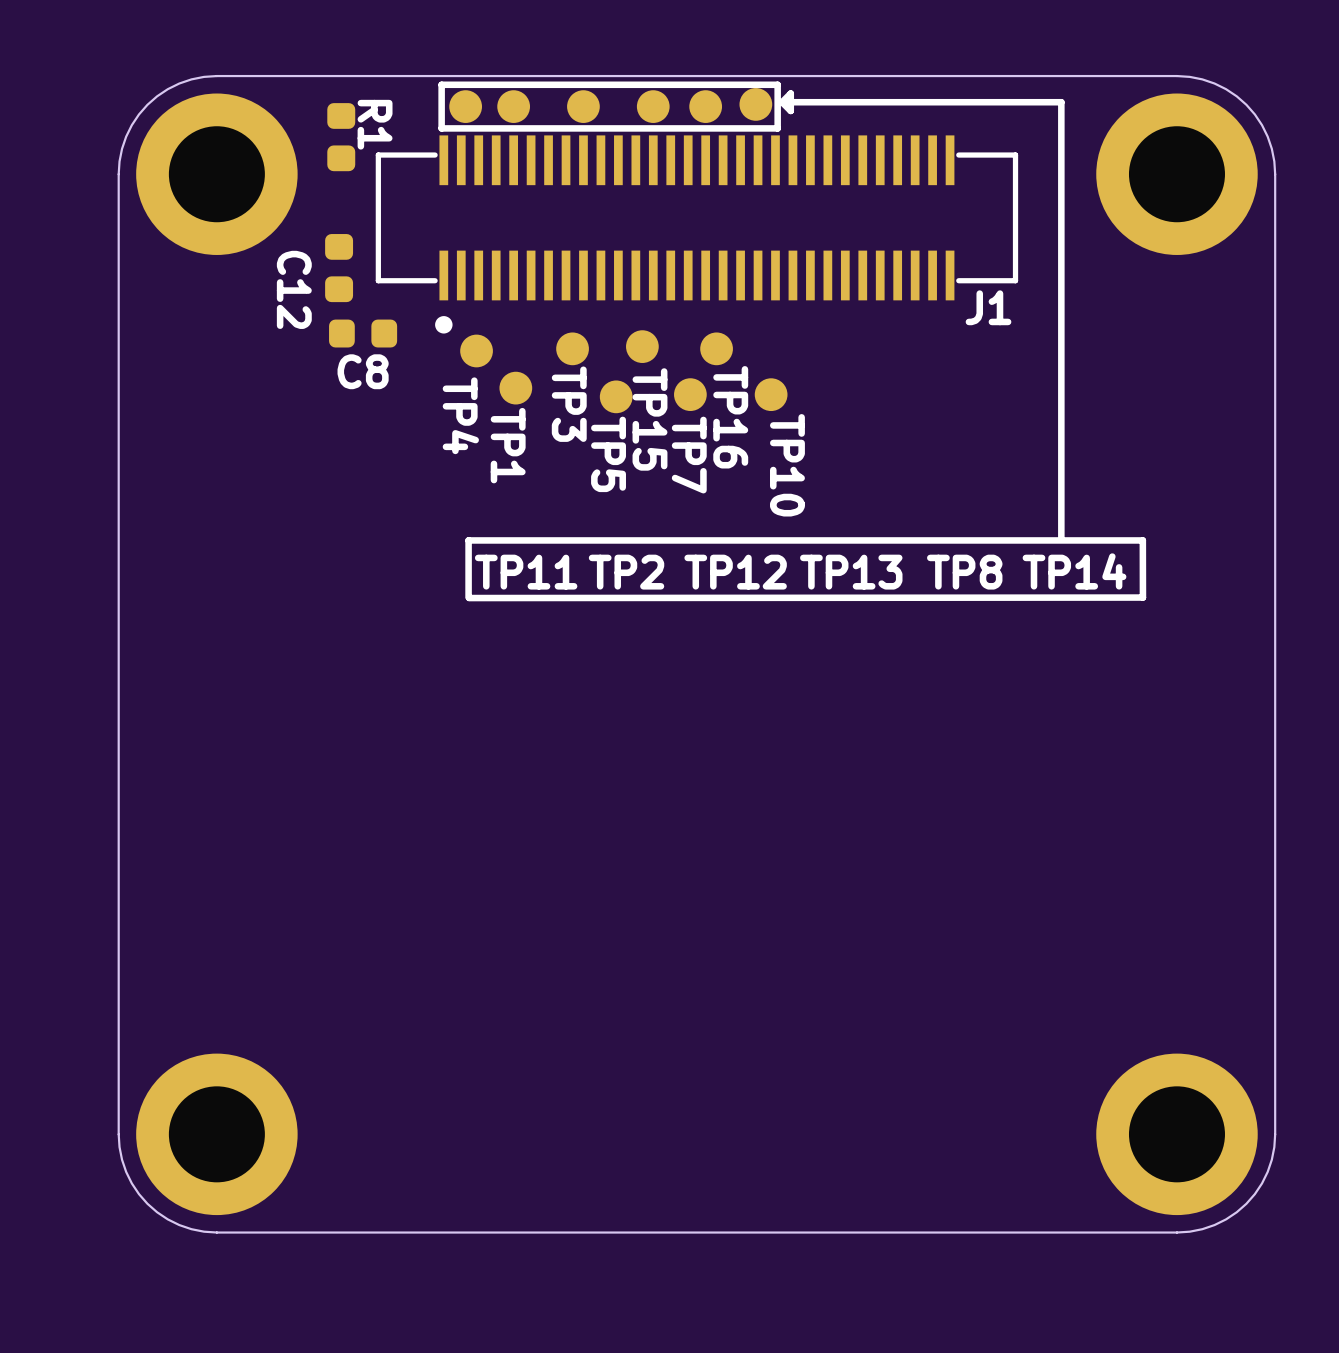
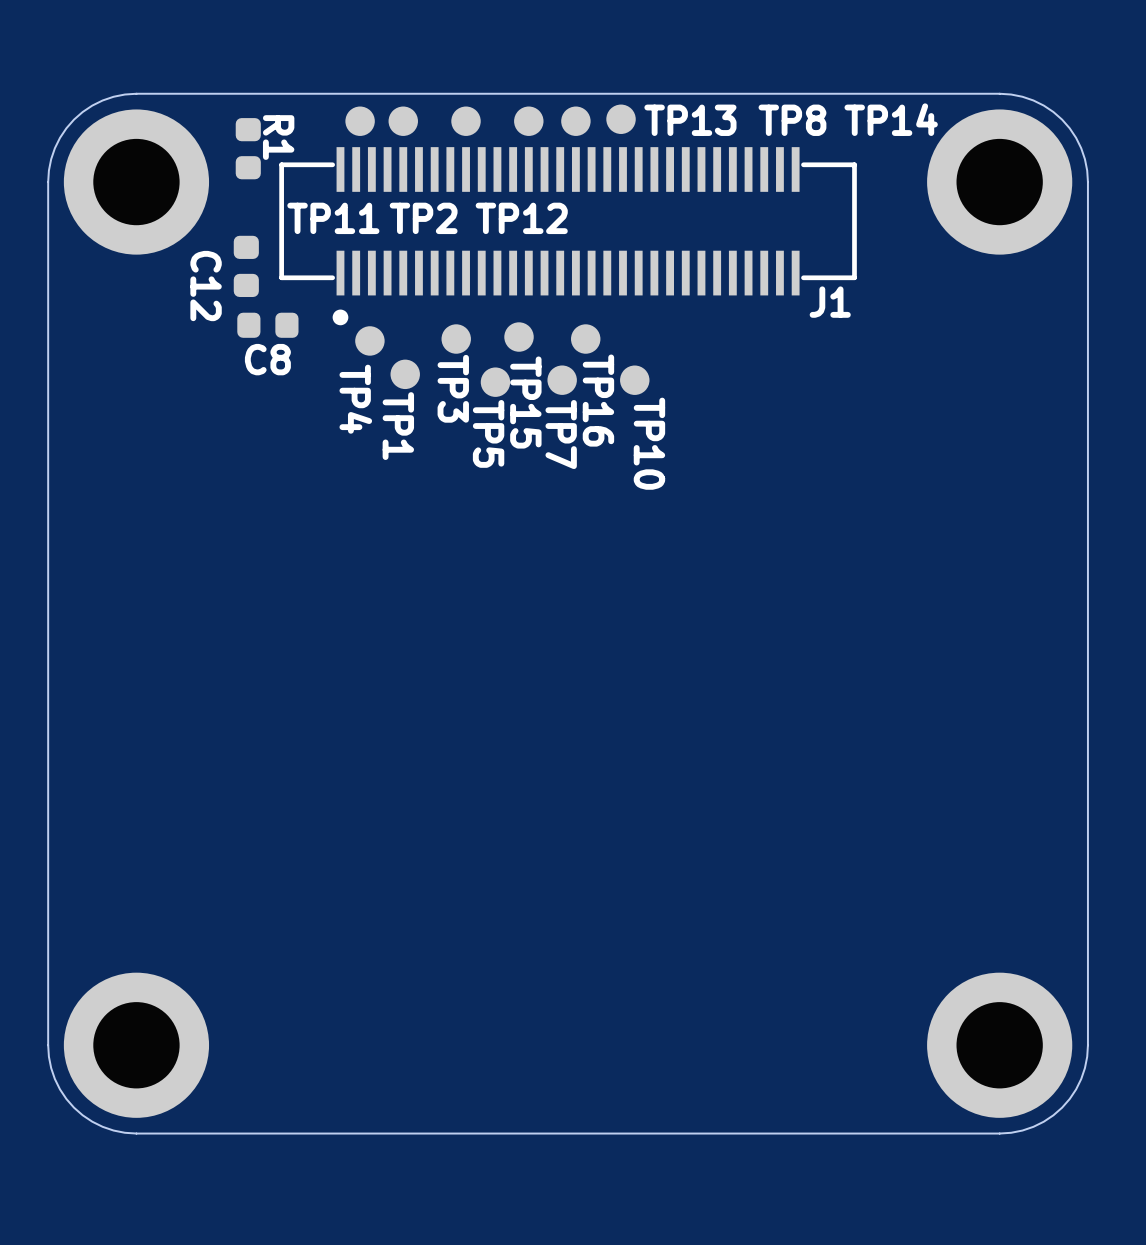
line: (777, 84) (441, 84) (441, 128) (777, 128) (777, 84) -> none
line: (782, 102) (790, 93) (790, 110) (782, 102) -> none
line: (782, 102) (1061, 102) (1061, 538) -> none
TP14 name position: TP14 (1074, 571) -> TP14 (891, 119)
TP11 name position: TP11 (526, 572) -> TP11 (333, 218)
TP2 name position: TP2 (626, 572) -> TP2 (423, 218)
TP12 name position: TP12 (735, 572) -> TP12 (521, 218)
TP13 name position: TP13 (851, 572) -> TP13 (690, 120)
TP8 name position: TP8 (964, 572) -> TP8 (792, 120)
line: (468, 597) (468, 540) (1142, 540) (1142, 597) (469, 598) -> none

